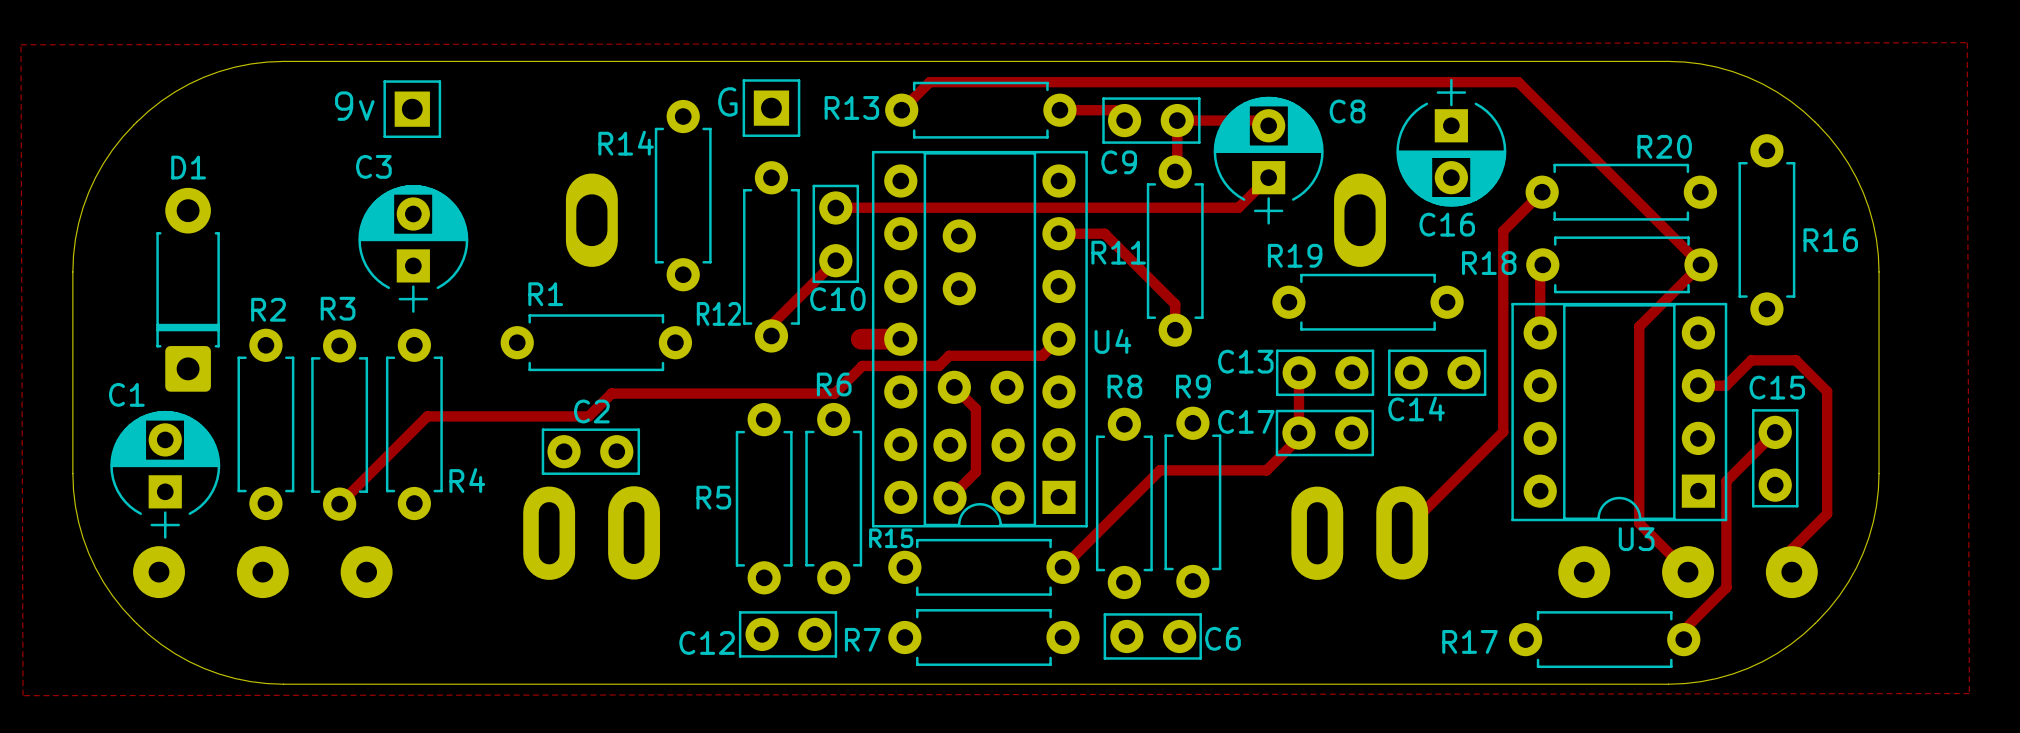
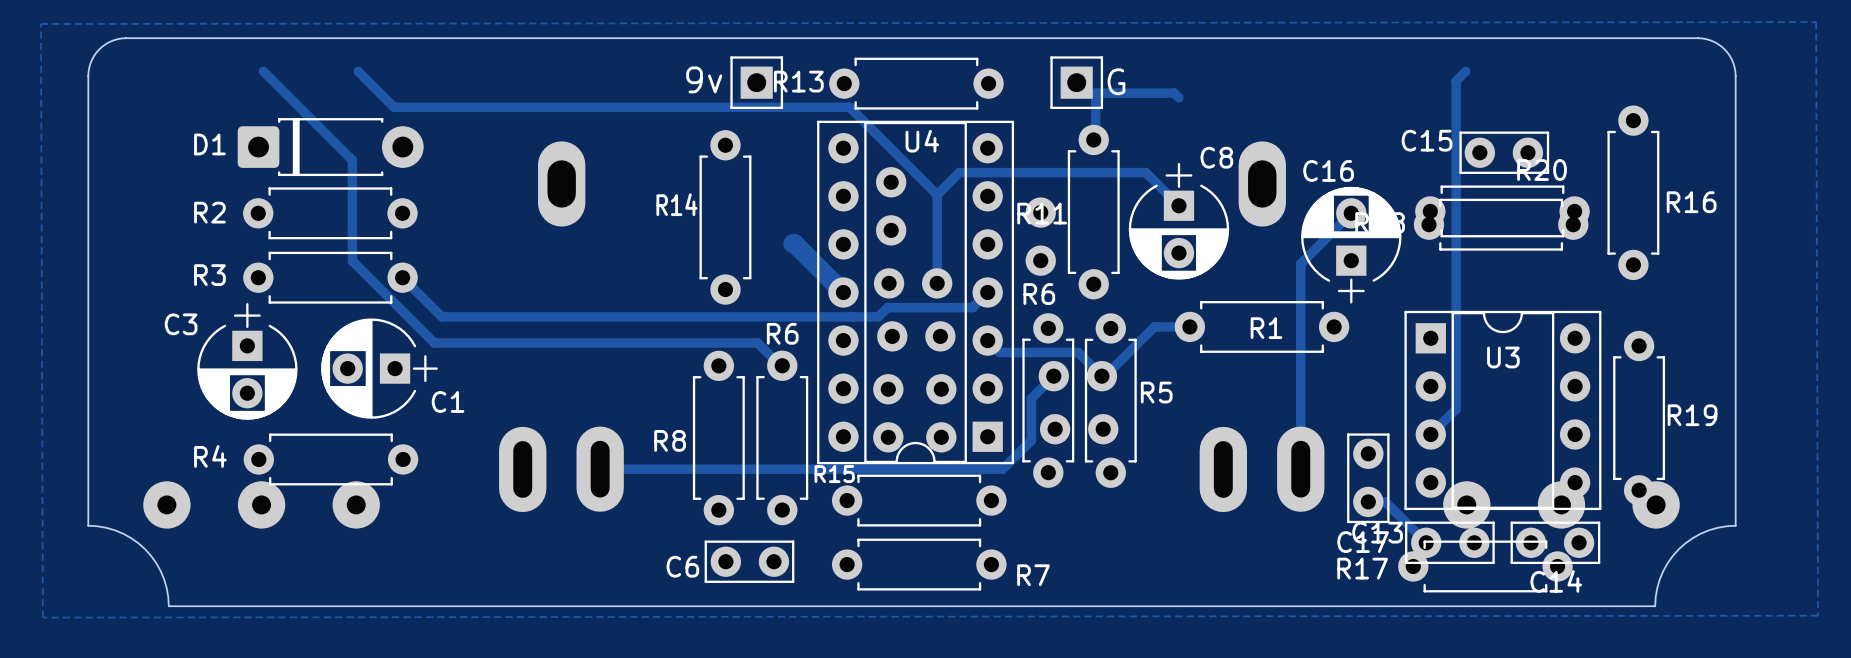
track: none -> (263, 71) (352, 160) (352, 261) (434, 343) (757, 343) (781, 366)
track: none -> (358, 71) (394, 107) (849, 107) (937, 194)
track: none -> (1465, 71) (1456, 81) (1456, 409) (1430, 434)
part text position: G (727, 101) -> G (1116, 81)
part position: (771, 108) -> (1076, 82)
part position: (412, 109) -> (756, 82)
track: (901, 110) (929, 82) (1518, 82) (1701, 264) (1639, 326) (1639, 523) (1688, 572) -> none
track: (1059, 110) (1114, 110) (1124, 120) -> none
C8 name position: C8 (1347, 111) -> C8 (1216, 157)
C9 side: top (1151, 120) -> bottom (1040, 236)
C16 rotation: 0° (1451, 142) -> 180° (1351, 245)
C16 position: (1451, 142) -> (1351, 245)
C8 rotation: 0° (1268, 160) -> 180° (1178, 221)
C8 position: (1268, 160) -> (1178, 221)
C3 name position: C3 (373, 166) -> C3 (181, 324)
D1 name position: D1 (188, 167) -> D1 (209, 144)
track: (1268, 177) (1238, 207) (1232, 207) -> (1178, 205) (1145, 172)
track: (1542, 192) (1503, 231) (1503, 431) (1402, 532) -> (1351, 213) (1300, 263) (1300, 469)
R20 position: (1621, 192) -> (1502, 211)
R14: (683, 195) -> none
track: (836, 207) (1027, 207) -> (937, 194) (959, 172)
track: none -> (937, 194) (937, 283)
C10 side: top (835, 233) -> bottom (913, 283)
track: (1058, 233) (1104, 233) (1175, 304) (1175, 330) -> none
C3 rotation: 0° (413, 248) -> 180° (247, 361)
C3 position: (413, 248) -> (247, 361)
R19 name position: R19 (1295, 255) -> R19 (1692, 415)
track: (835, 260) (771, 325) (771, 335) -> none
part position: (959, 262) -> (891, 206)
track: (1542, 264) (1540, 267) (1540, 332) -> none
board edge: (72, 271) (75, 239) (88, 192) (112, 149) (133, 125) (161, 101) (203, 77) (250, 63) (283, 61) (1668, 61) (1700, 63) (1747, 77) (1776, 92) (1803, 111) (1829, 137) (1848, 163) (1863, 192) (1873, 223) (1879, 271) -> (88, 231) (89, 67) (94, 55) (102, 46) (113, 40) (126, 38) (1702, 38) (1721, 46) (1729, 55) (1734, 67) (1735, 231)
D1 rotation: 0° (188, 289) -> 90° clockwise (330, 147)
D1 position: (188, 289) -> (330, 147)
R1 name position: R1 (545, 294) -> R1 (1266, 328)
R19 rotation: 0° (1368, 302) -> 90° clockwise (1639, 418)
R19 position: (1368, 302) -> (1639, 418)
R3 name position: R3 (338, 308) -> R3 (209, 275)
R2 name position: R2 (268, 309) -> R2 (209, 212)
R12 name: R12 (718, 313) -> R14 (676, 204)
track: (861, 339) (900, 339) -> (792, 243) (843, 292)
U4 name position: U4 (1112, 341) -> U4 (922, 141)
R1 position: (596, 342) -> (1261, 326)
track: (862, 365) (834, 393) (611, 393) (588, 416) (427, 416) (339, 504) -> (808, 316) (441, 316) (402, 277)
C13 position: (1325, 372) -> (1449, 542)
C14 rotation: 0° (1437, 372) -> 180° (1555, 542)
C14 position: (1437, 372) -> (1555, 542)
track: (1298, 373) (1298, 438) (1266, 470) (1159, 470) (1063, 567) -> none
track: none -> (1189, 326) (1154, 326) (1105, 376) (1101, 376) (1078, 352) (999, 352) (987, 340)
track: (1698, 385) (1726, 385) (1751, 360) (1795, 360) (1827, 391) (1827, 513) (1791, 549) (1791, 572) -> none
track: (954, 387) (975, 408) (975, 472) (949, 498) -> none
C15 name position: C15 (1777, 387) -> C15 (1427, 140)
C1 name position: C1 (126, 394) -> C1 (448, 401)
U3 rotation: 0° (1619, 412) -> 180° (1502, 410)
R2 rotation: 0° (265, 424) -> 90° clockwise (330, 213)
R2 position: (265, 424) -> (330, 213)
R4 rotation: 0° (414, 424) -> 90° clockwise (330, 459)
R4 position: (414, 424) -> (330, 459)
R3 rotation: 0° (339, 425) -> 90° clockwise (330, 277)
track: none -> (1053, 376) (1031, 398) (1031, 440) (1002, 469) (600, 469)
part: none -> (1077, 376)
track: (1775, 432) (1726, 481) (1726, 587) (1683, 630) (1683, 639) -> none
C17 rotation: 0° (1324, 433) -> 90° counterclockwise (1368, 478)
C17 position: (1324, 433) -> (1368, 478)
C2: (590, 451) -> none
R6: none -> (1048, 400)
R5: none -> (1110, 400)
C15 rotation: 0° (1775, 458) -> 90° clockwise (1504, 152)
C15 position: (1775, 458) -> (1504, 152)
board edge: (72, 473) (78, 522) (88, 553) (103, 582) (133, 620) (161, 644) (203, 668) (250, 681) (283, 684) (1668, 684) (1700, 681) (1732, 674) (1776, 653) (1803, 634) (1829, 608) (1856, 567) (1868, 537) (1876, 506) (1879, 473) -> (88, 415) (88, 525) (114, 530) (131, 538) (145, 549) (160, 571) (166, 588) (168, 606) (1655, 606) (1659, 579) (1667, 563) (1678, 549) (1700, 533) (1717, 527) (1735, 525) (1735, 415)
C1 rotation: 0° (165, 474) -> 90° counterclockwise (379, 368)
C1 position: (165, 474) -> (379, 368)
R4 name position: R4 (467, 480) -> R4 (210, 456)
R5 name: R5 (713, 497) -> R8 (670, 440)
R9: (1192, 502) -> none
R8: (1124, 503) -> none
U3 name position: U3 (1636, 539) -> U3 (1503, 357)
track: none -> (1368, 501) (1385, 501) (1426, 542)
C12 side: top (788, 634) -> bottom (1079, 429)
C6 position: (1152, 636) -> (749, 561)
C6 name position: C6 (1222, 638) -> C6 (682, 566)
R7 name position: R7 (862, 639) -> R7 (1033, 575)

